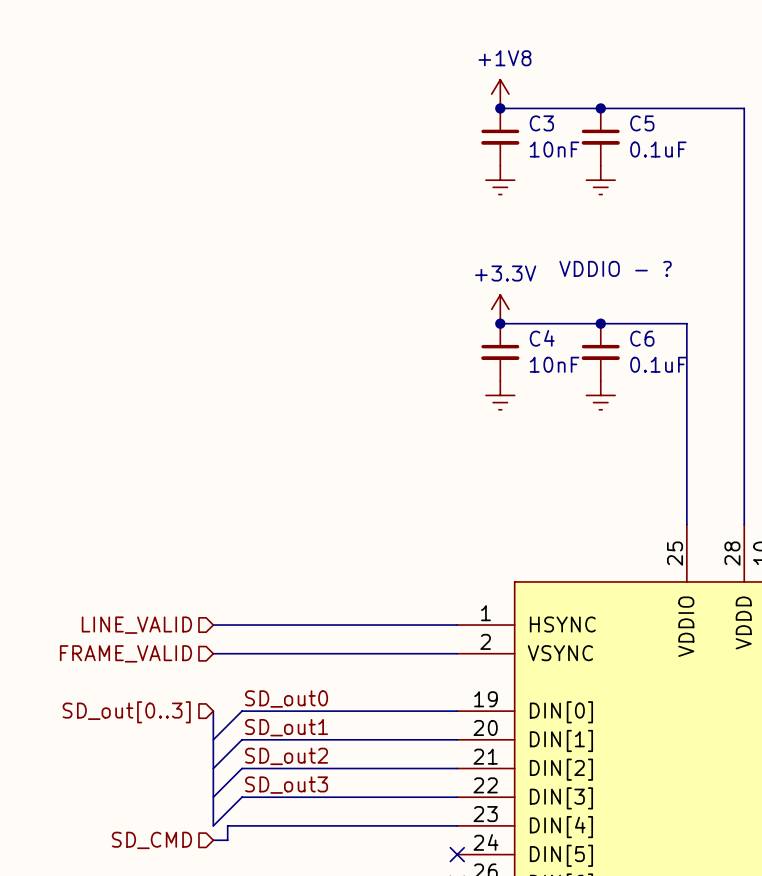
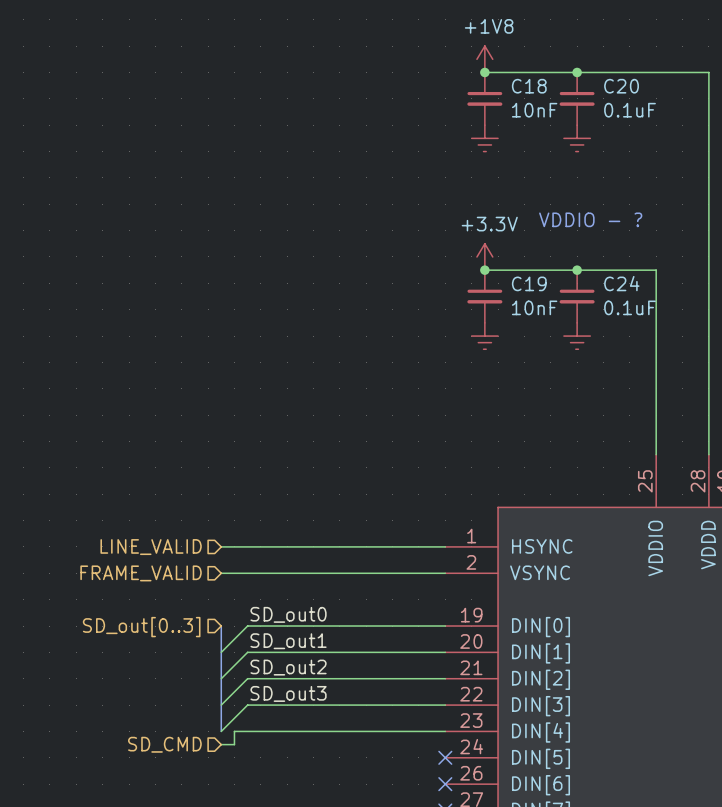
C3 name: C3 (541, 123) -> C18 (529, 86)
C5 name: C5 (642, 123) -> C20 (621, 86)
C4 name: C4 (542, 338) -> C19 (529, 283)
C6 name: C6 (642, 338) -> C24 (621, 283)

